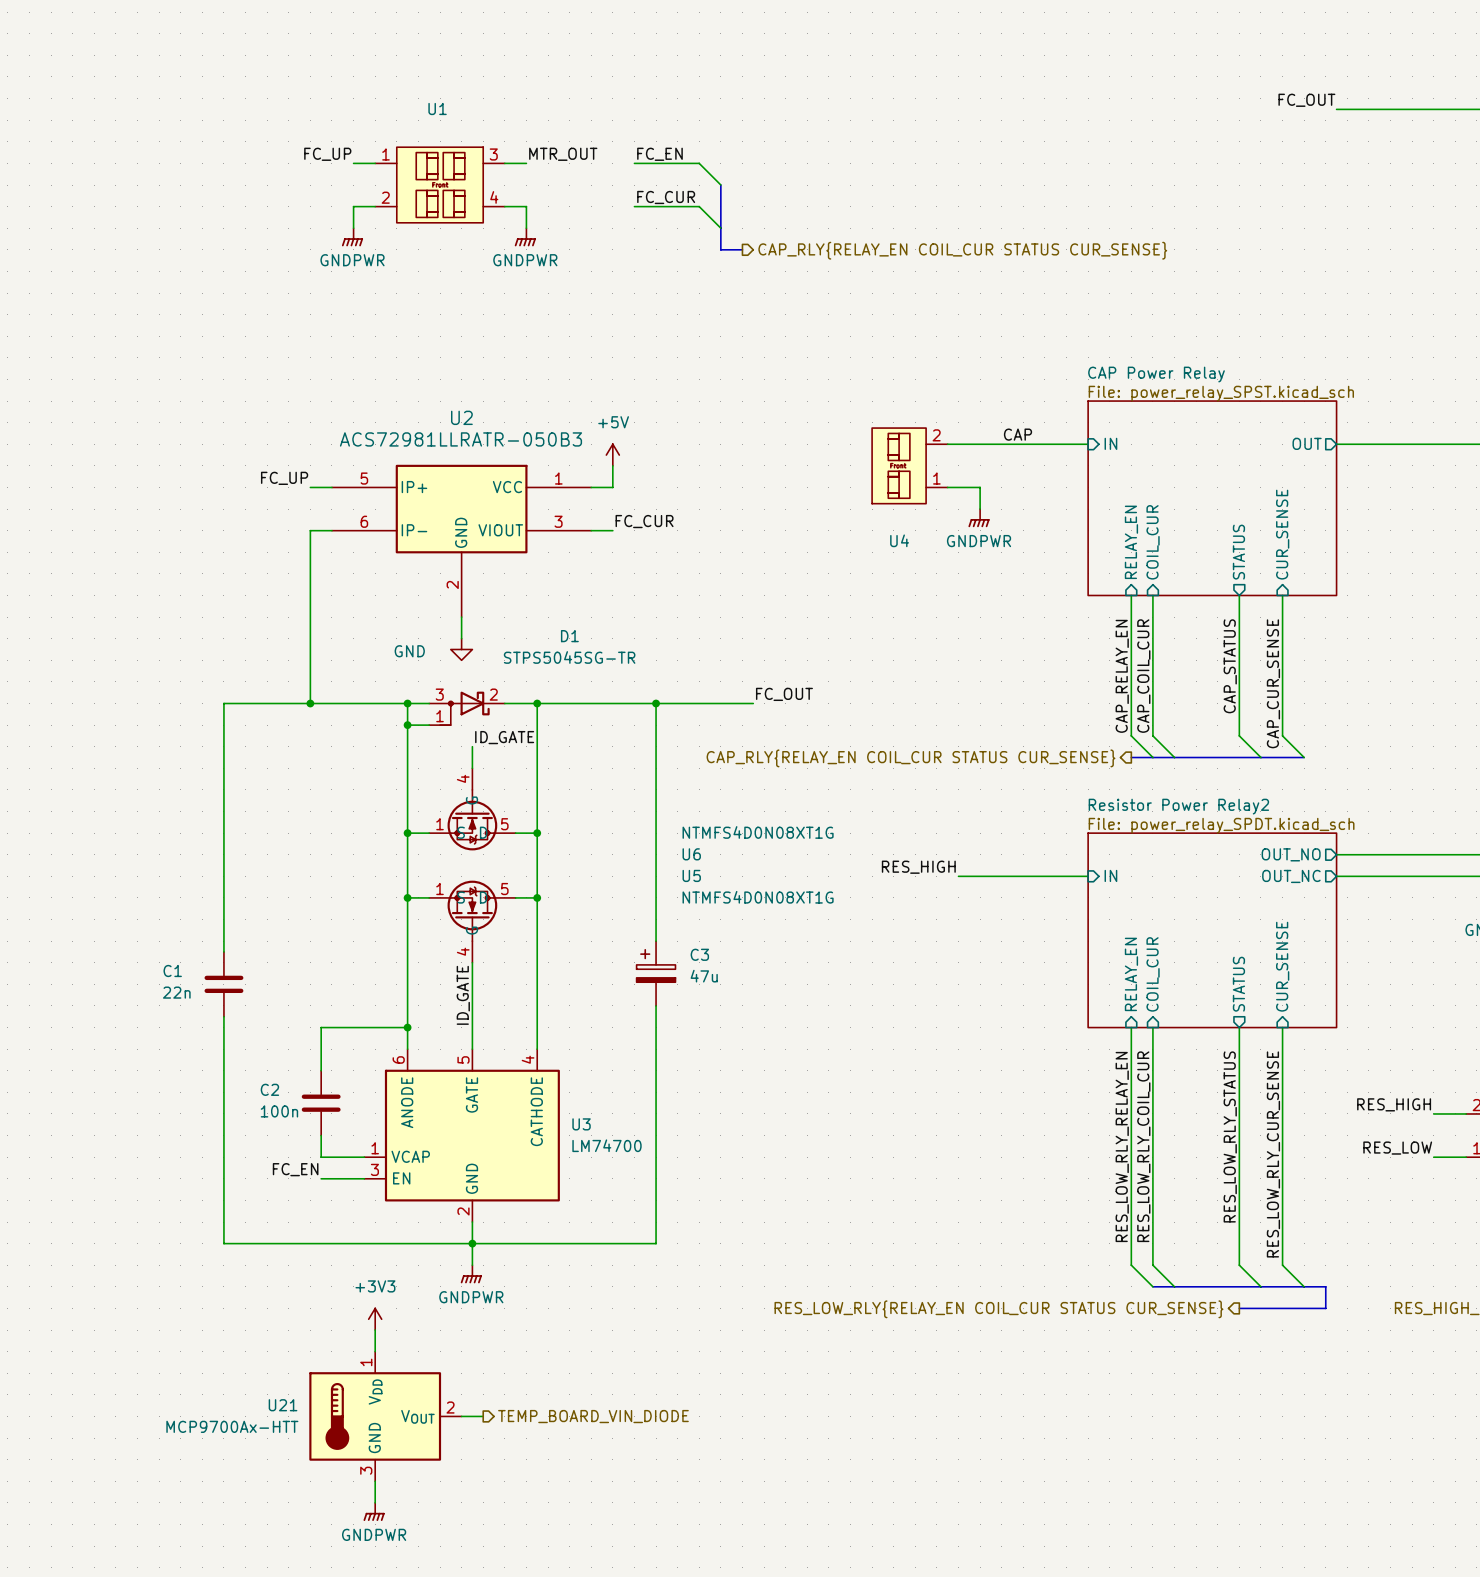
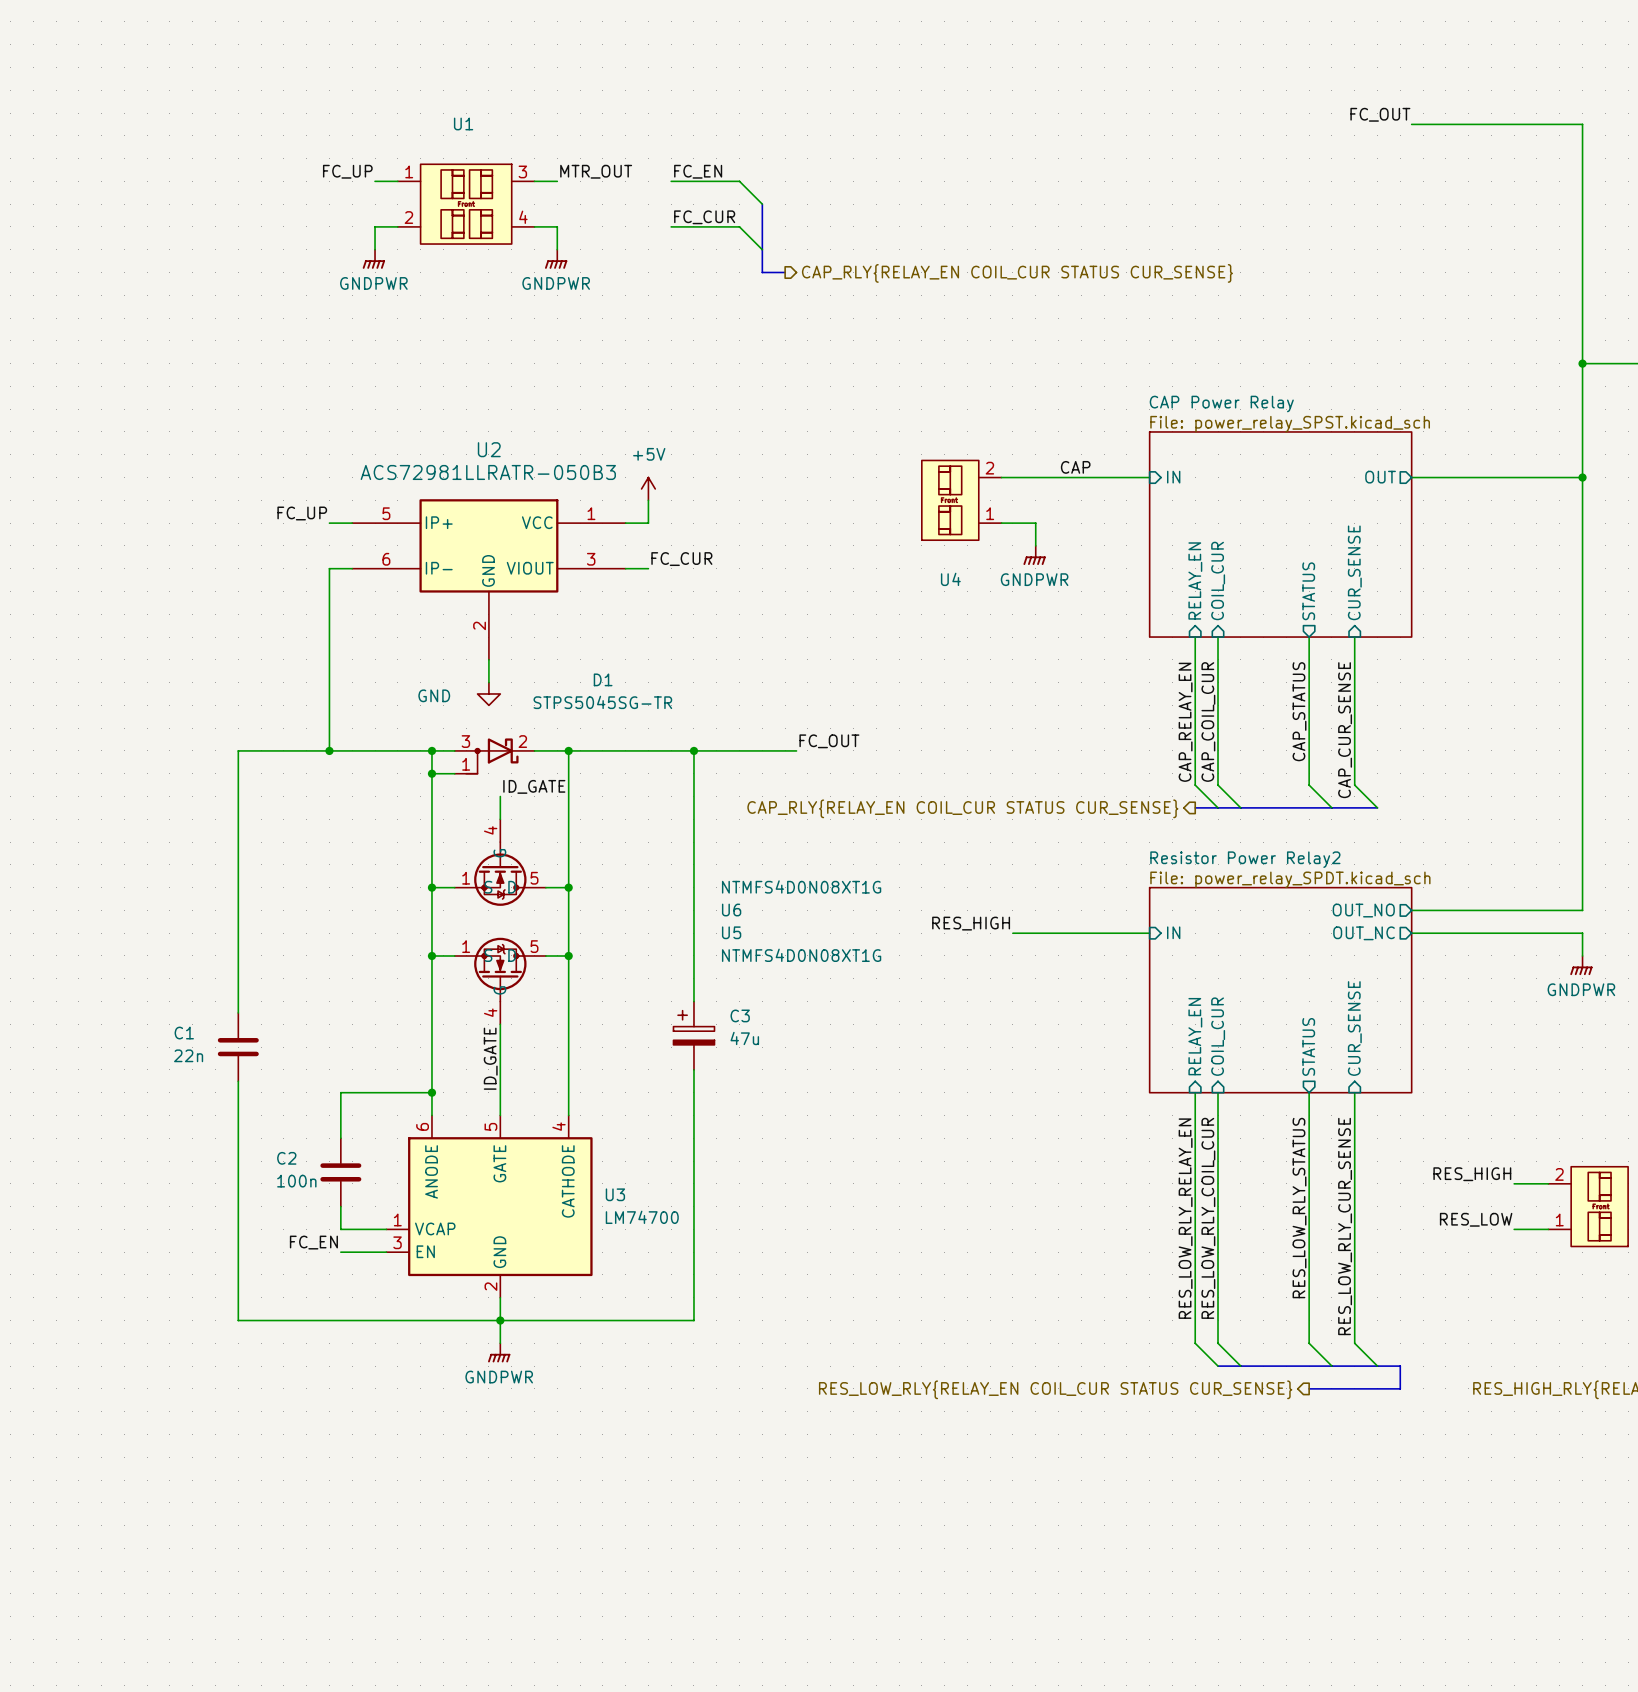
power symbol: +3V3 (375, 1319) -> none
wire: (375, 1330) (375, 1351) -> none
U21: MCP9700Ax-HTT (385, 1416) -> none
wire: (461, 1416) (483, 1416) -> none
hierarchical label: TEMP_BOARD_VIN_DIODE (593, 1416) -> none
wire: (375, 1481) (375, 1502) -> none
power symbol: GNDPWR (374, 1511) -> none

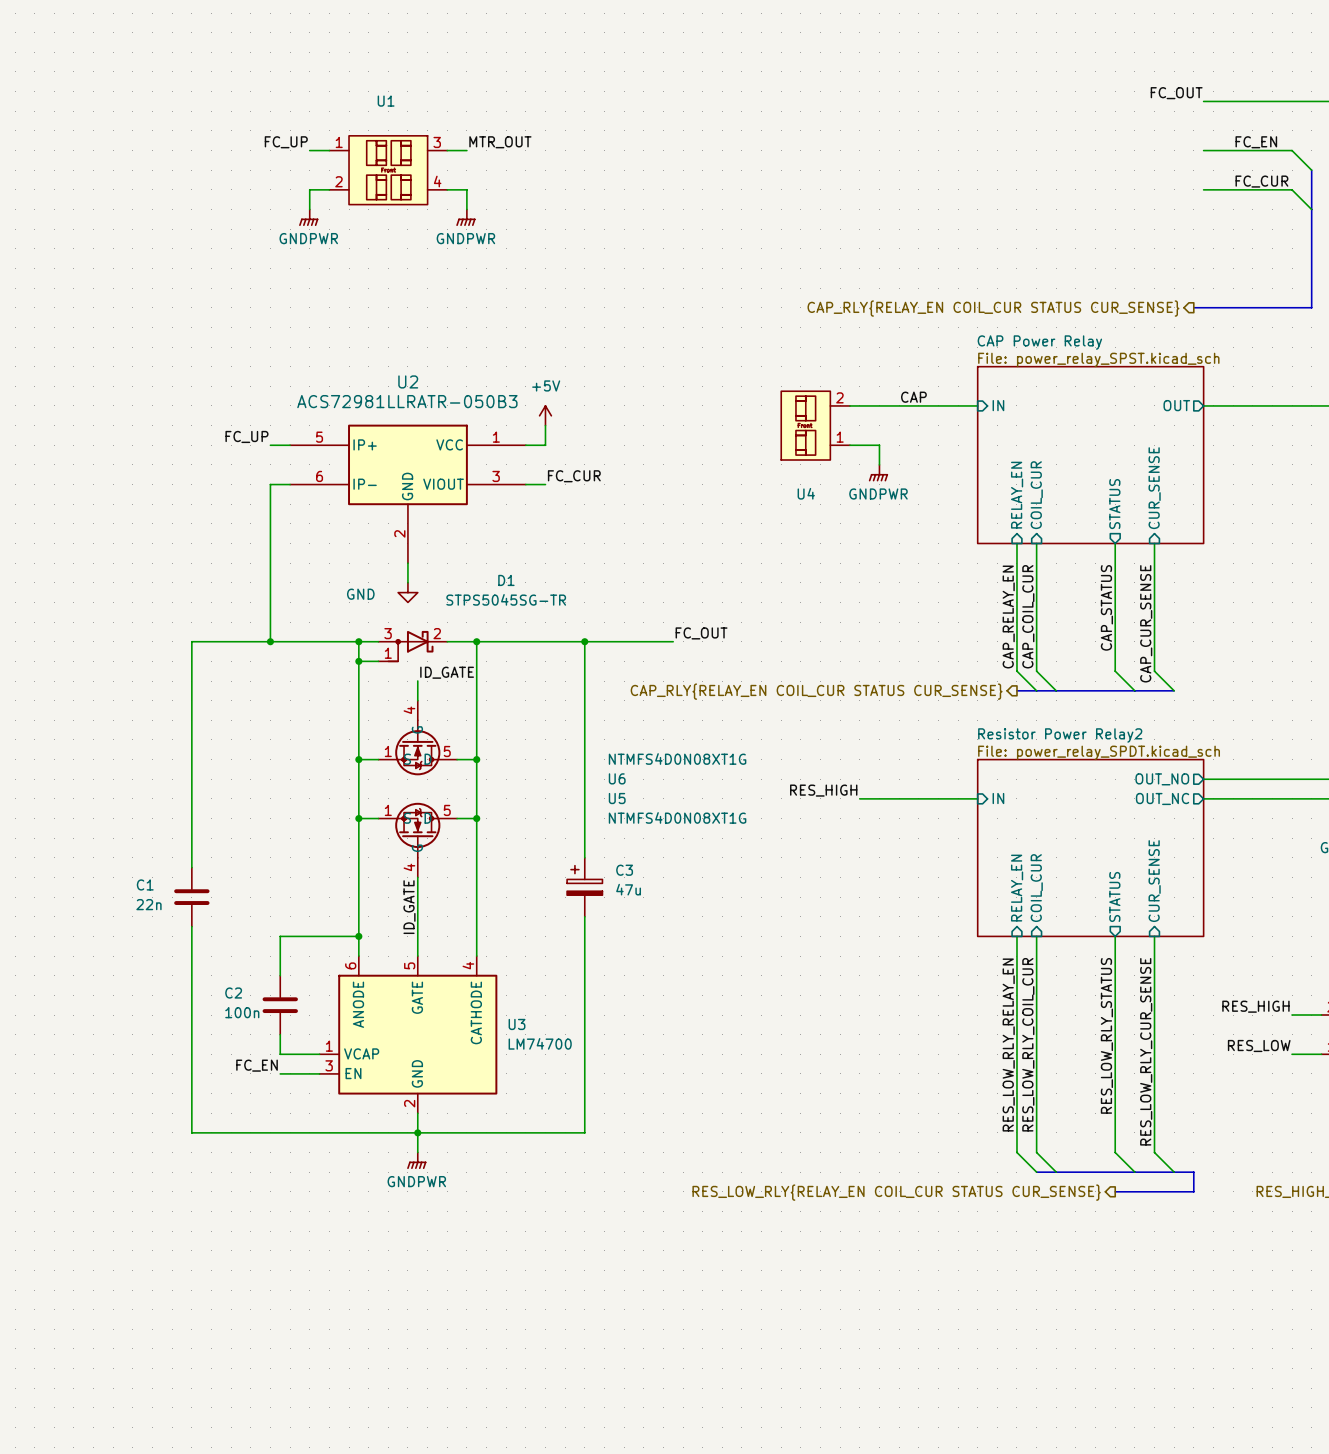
label: FC_EN (698, 171) -> none
label: none -> FC_EN (1256, 142)
wire: (671, 181) (739, 181) (762, 204) -> none
wire: none -> (1203, 150) (1292, 150) (1311, 170)
bus: (762, 204) (762, 272) (785, 272) -> none
bus: none -> (1311, 170) (1311, 307) (1193, 307)
label: FC_CUR (704, 217) -> none
label: none -> FC_CUR (1261, 181)
wire: (671, 226) (739, 226) (762, 249) -> none
wire: none -> (1203, 189) (1292, 189) (1311, 209)
hierarchical label: CAP_RLY{RELAY_EN COIL_CUR STATUS CUR_SENSE} (1017, 273) -> none
hierarchical label: none -> CAP_RLY{RELAY_EN COIL_CUR STATUS CUR_SENSE} (993, 308)

